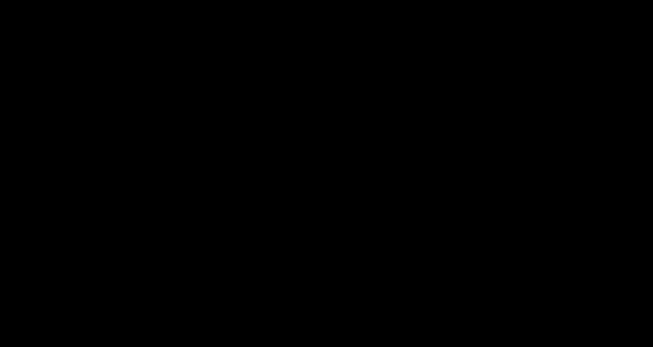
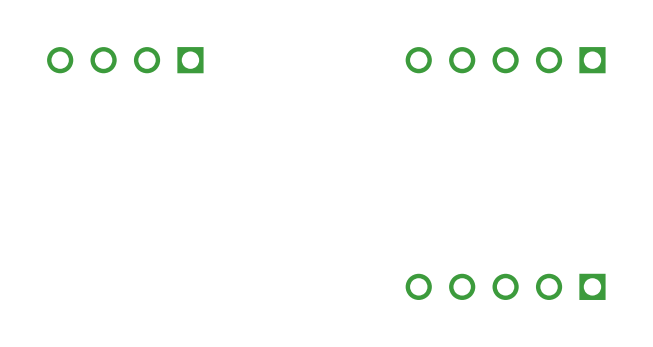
part: none -> (125, 60)
part: none -> (505, 60)
part: none -> (505, 286)

